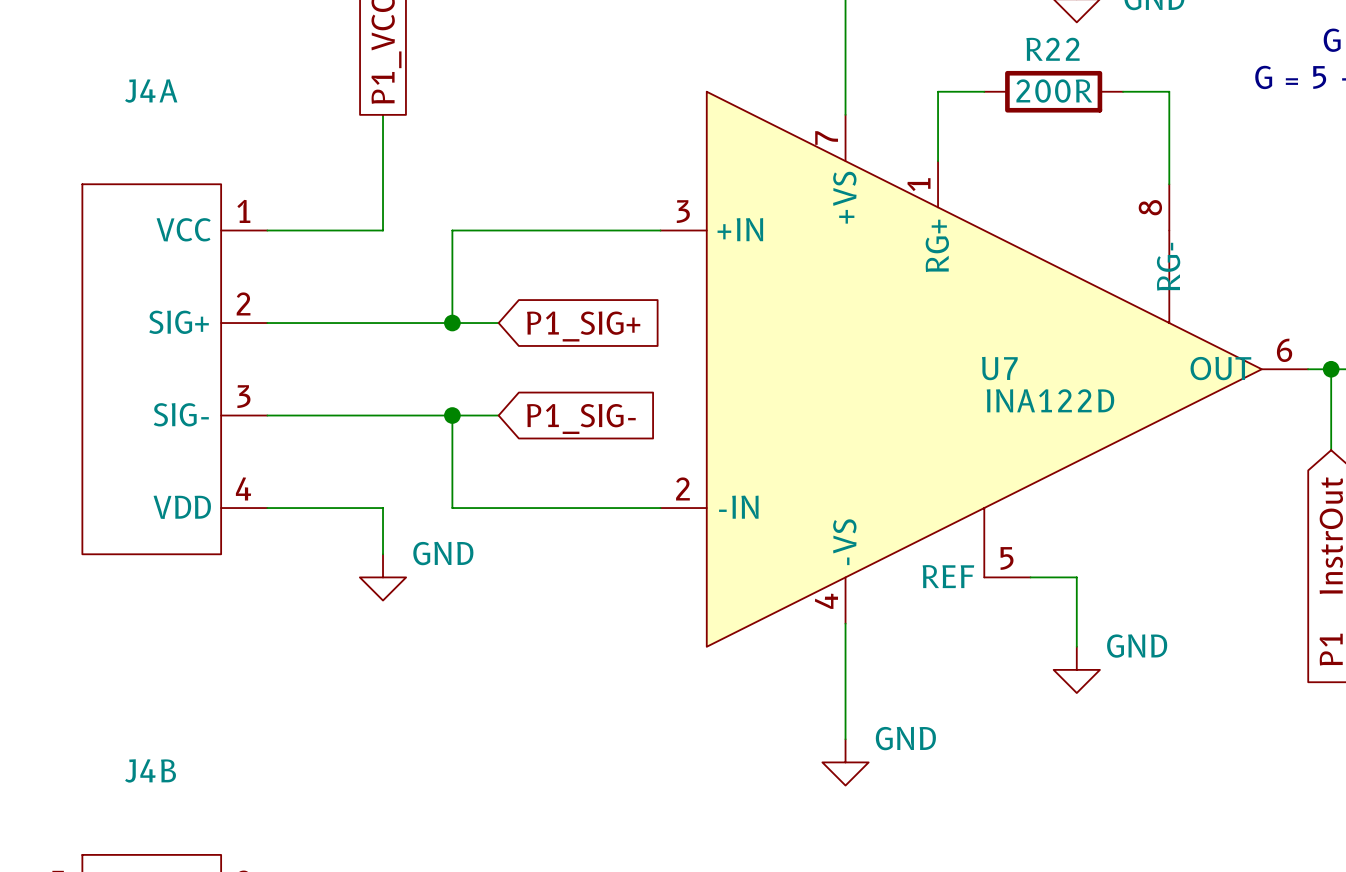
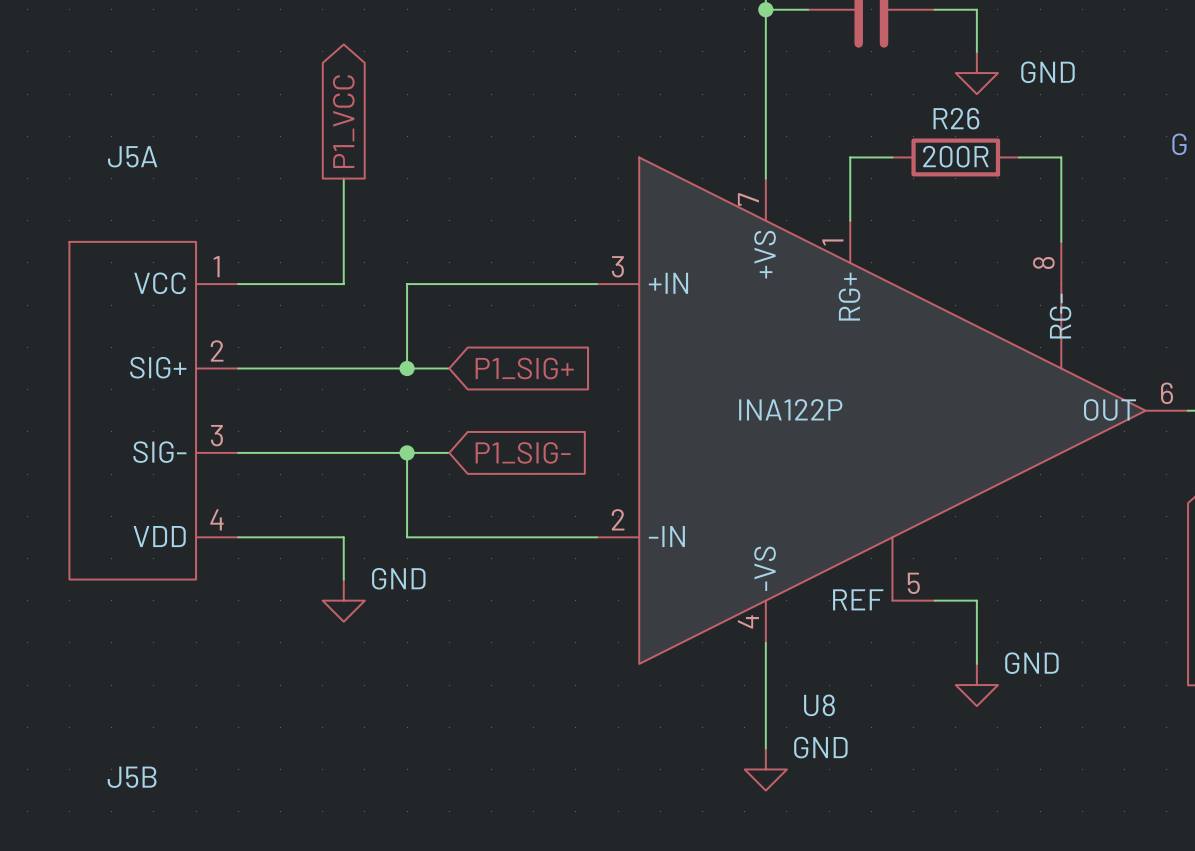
R22 name: R22 (1052, 49) -> R26 (956, 118)
J4A name: J4A (151, 91) -> J5A (132, 156)
U7 name: U7 (999, 368) -> U8 (819, 705)
U7 value: INA122D (1050, 400) -> INA122P (790, 409)
J4B name: J4B (150, 770) -> J5B (132, 777)

